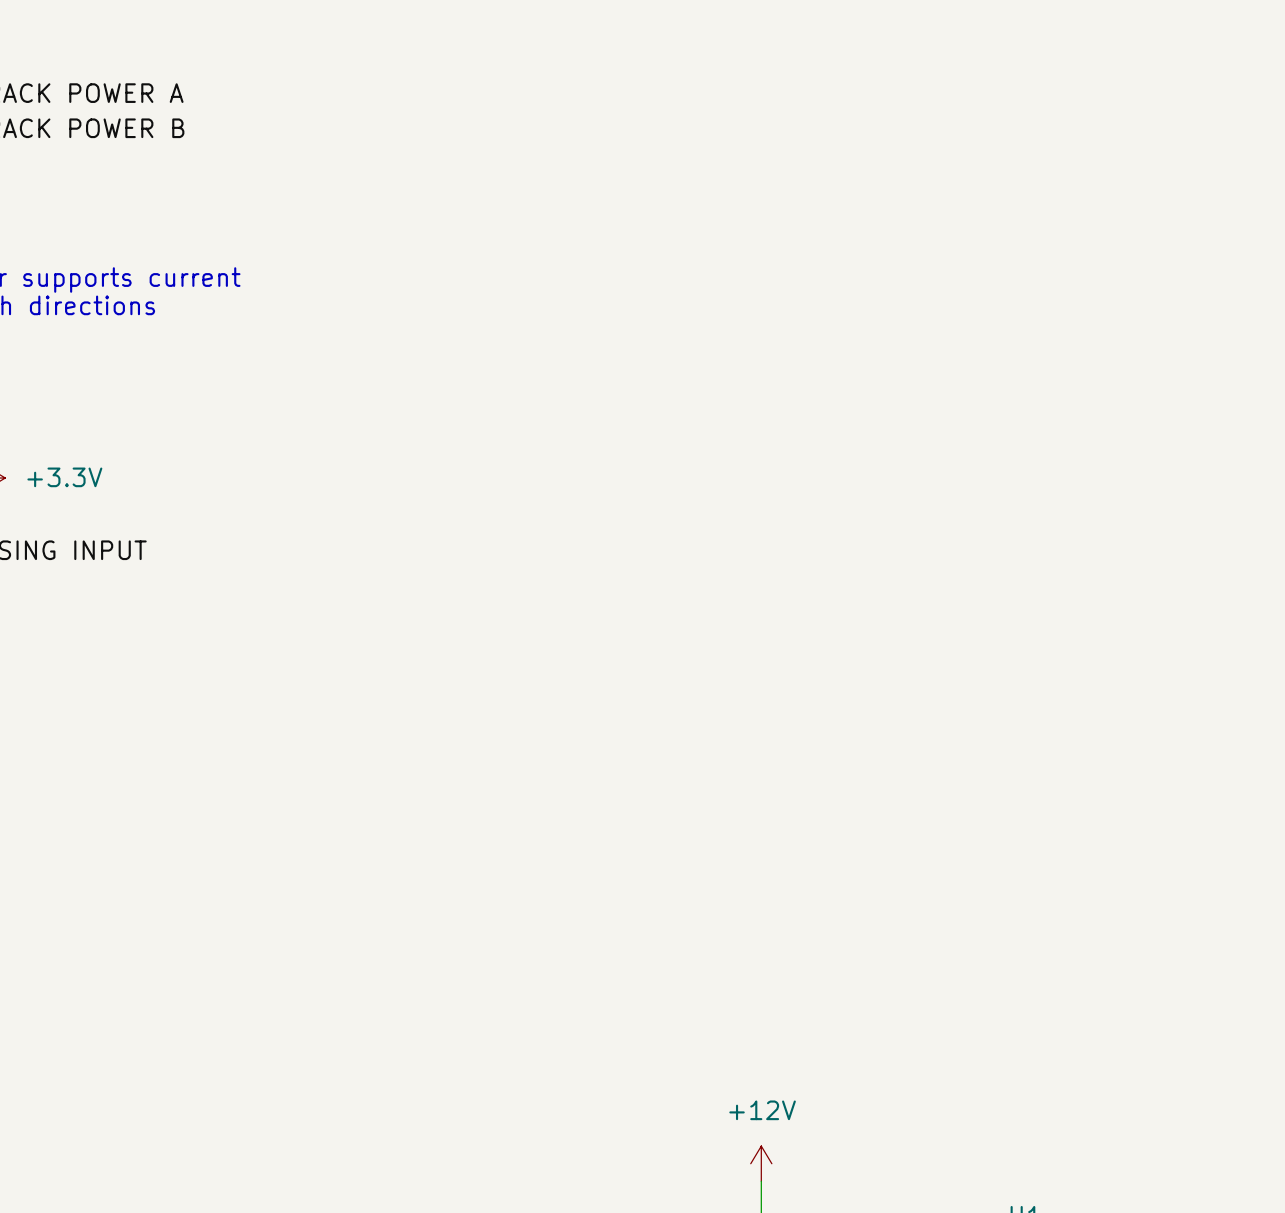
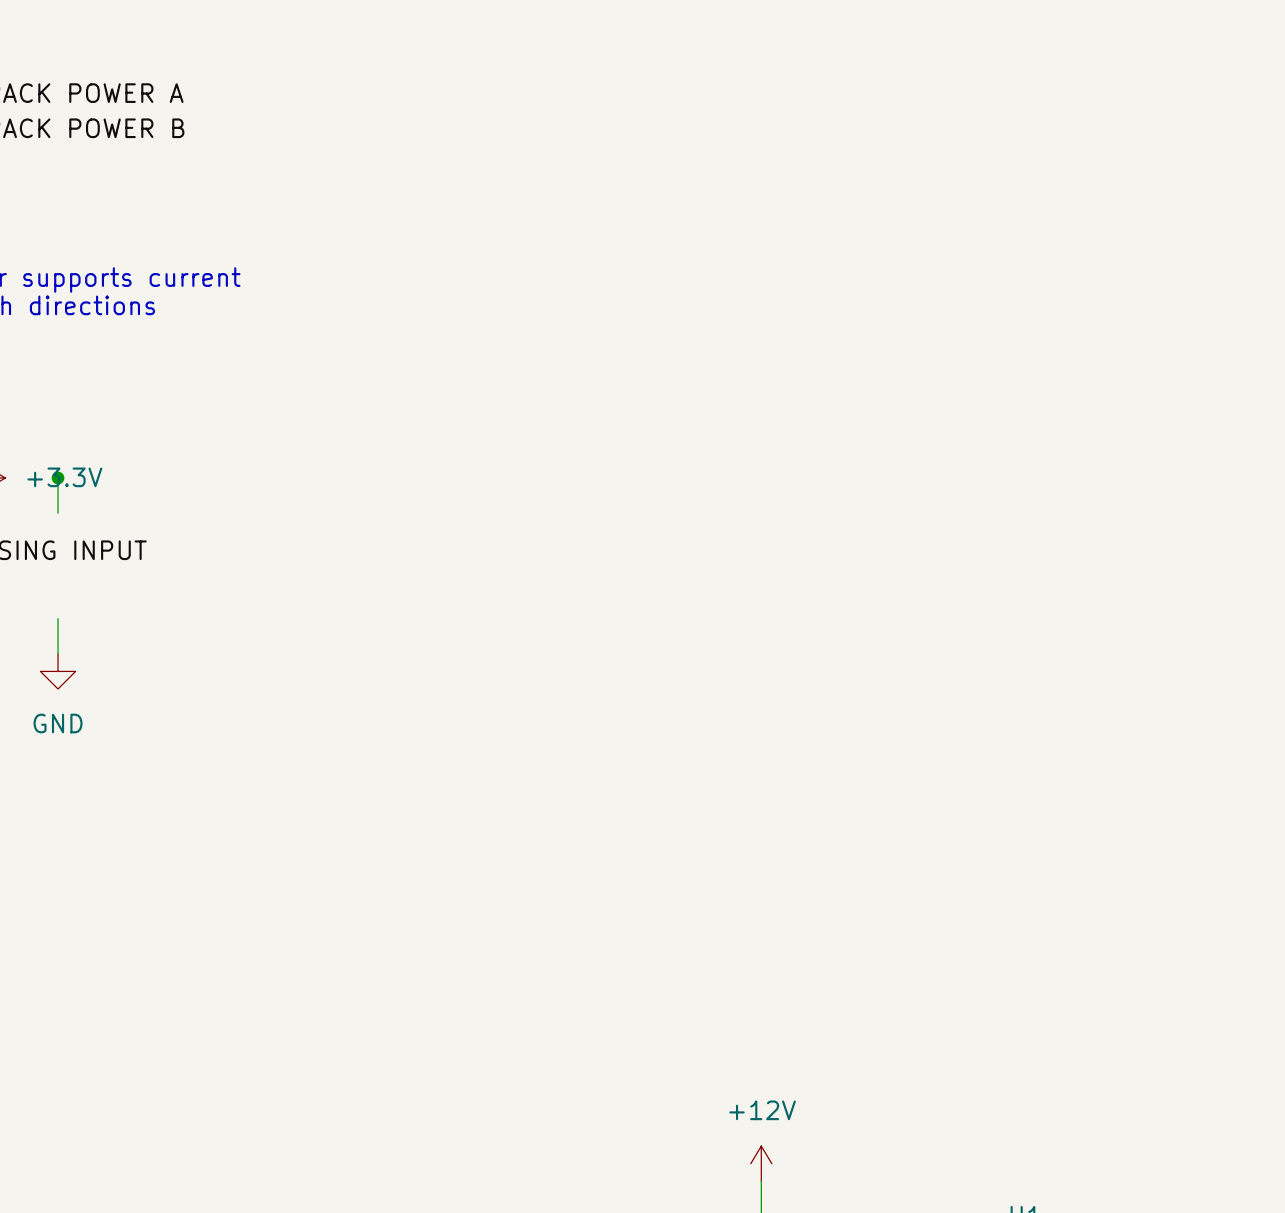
wire: none -> (58, 478) (58, 513)
junction: none -> (58, 478)
wire: none -> (58, 618) (58, 653)
power symbol: none -> GND (58, 671)

